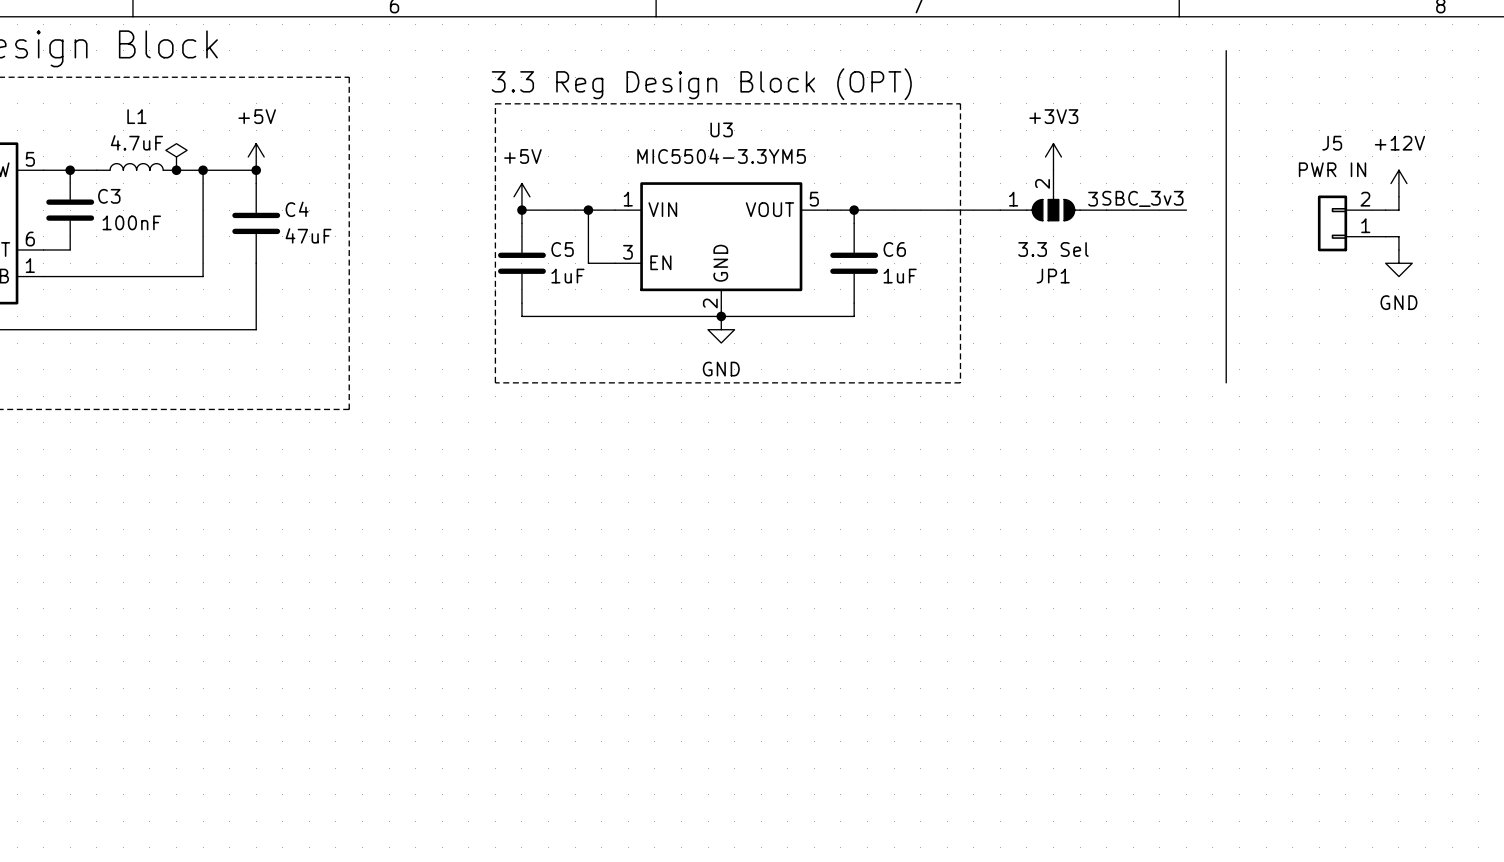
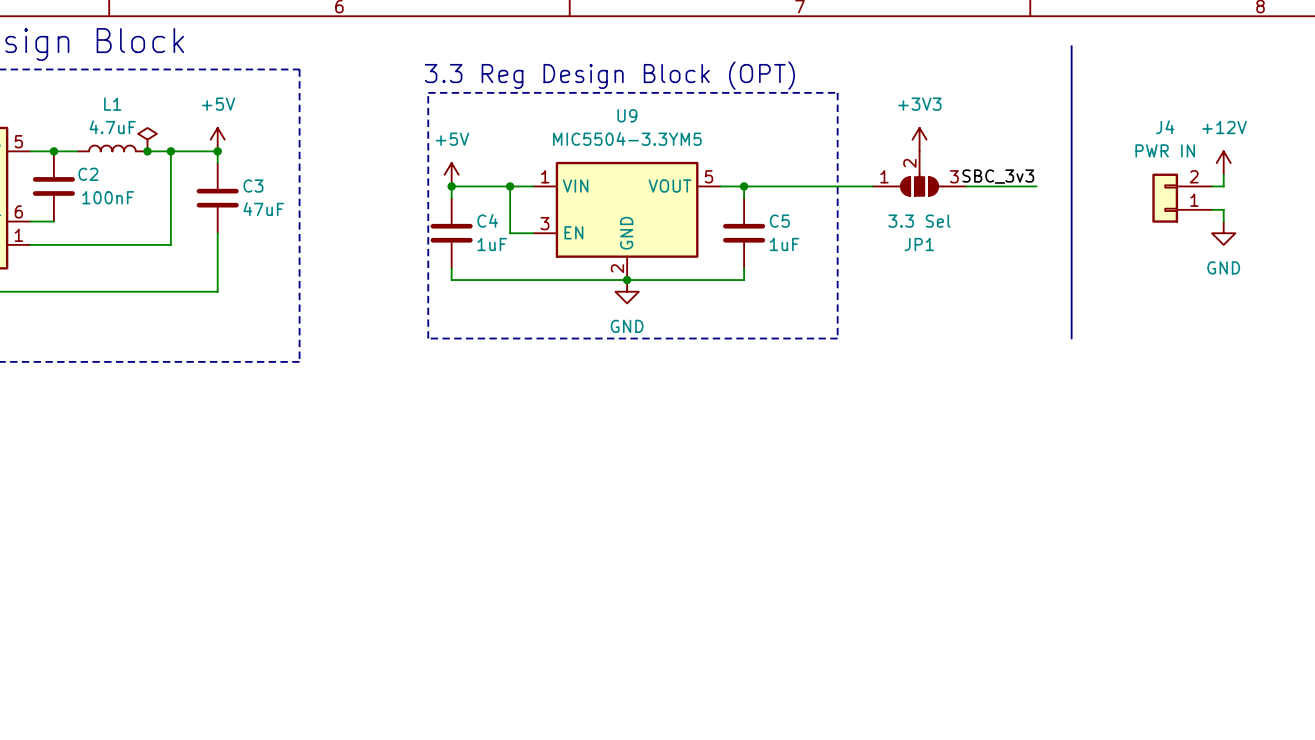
U3 name: U3 (721, 129) -> U9 (627, 115)
J5 name: J5 (1332, 143) -> J4 (1165, 127)
C3 name: C3 (109, 196) -> C2 (88, 174)
C4 name: C4 (297, 209) -> C3 (253, 186)
C5 name: C5 (562, 249) -> C4 (487, 220)
C6 name: C6 (894, 249) -> C5 (779, 221)

